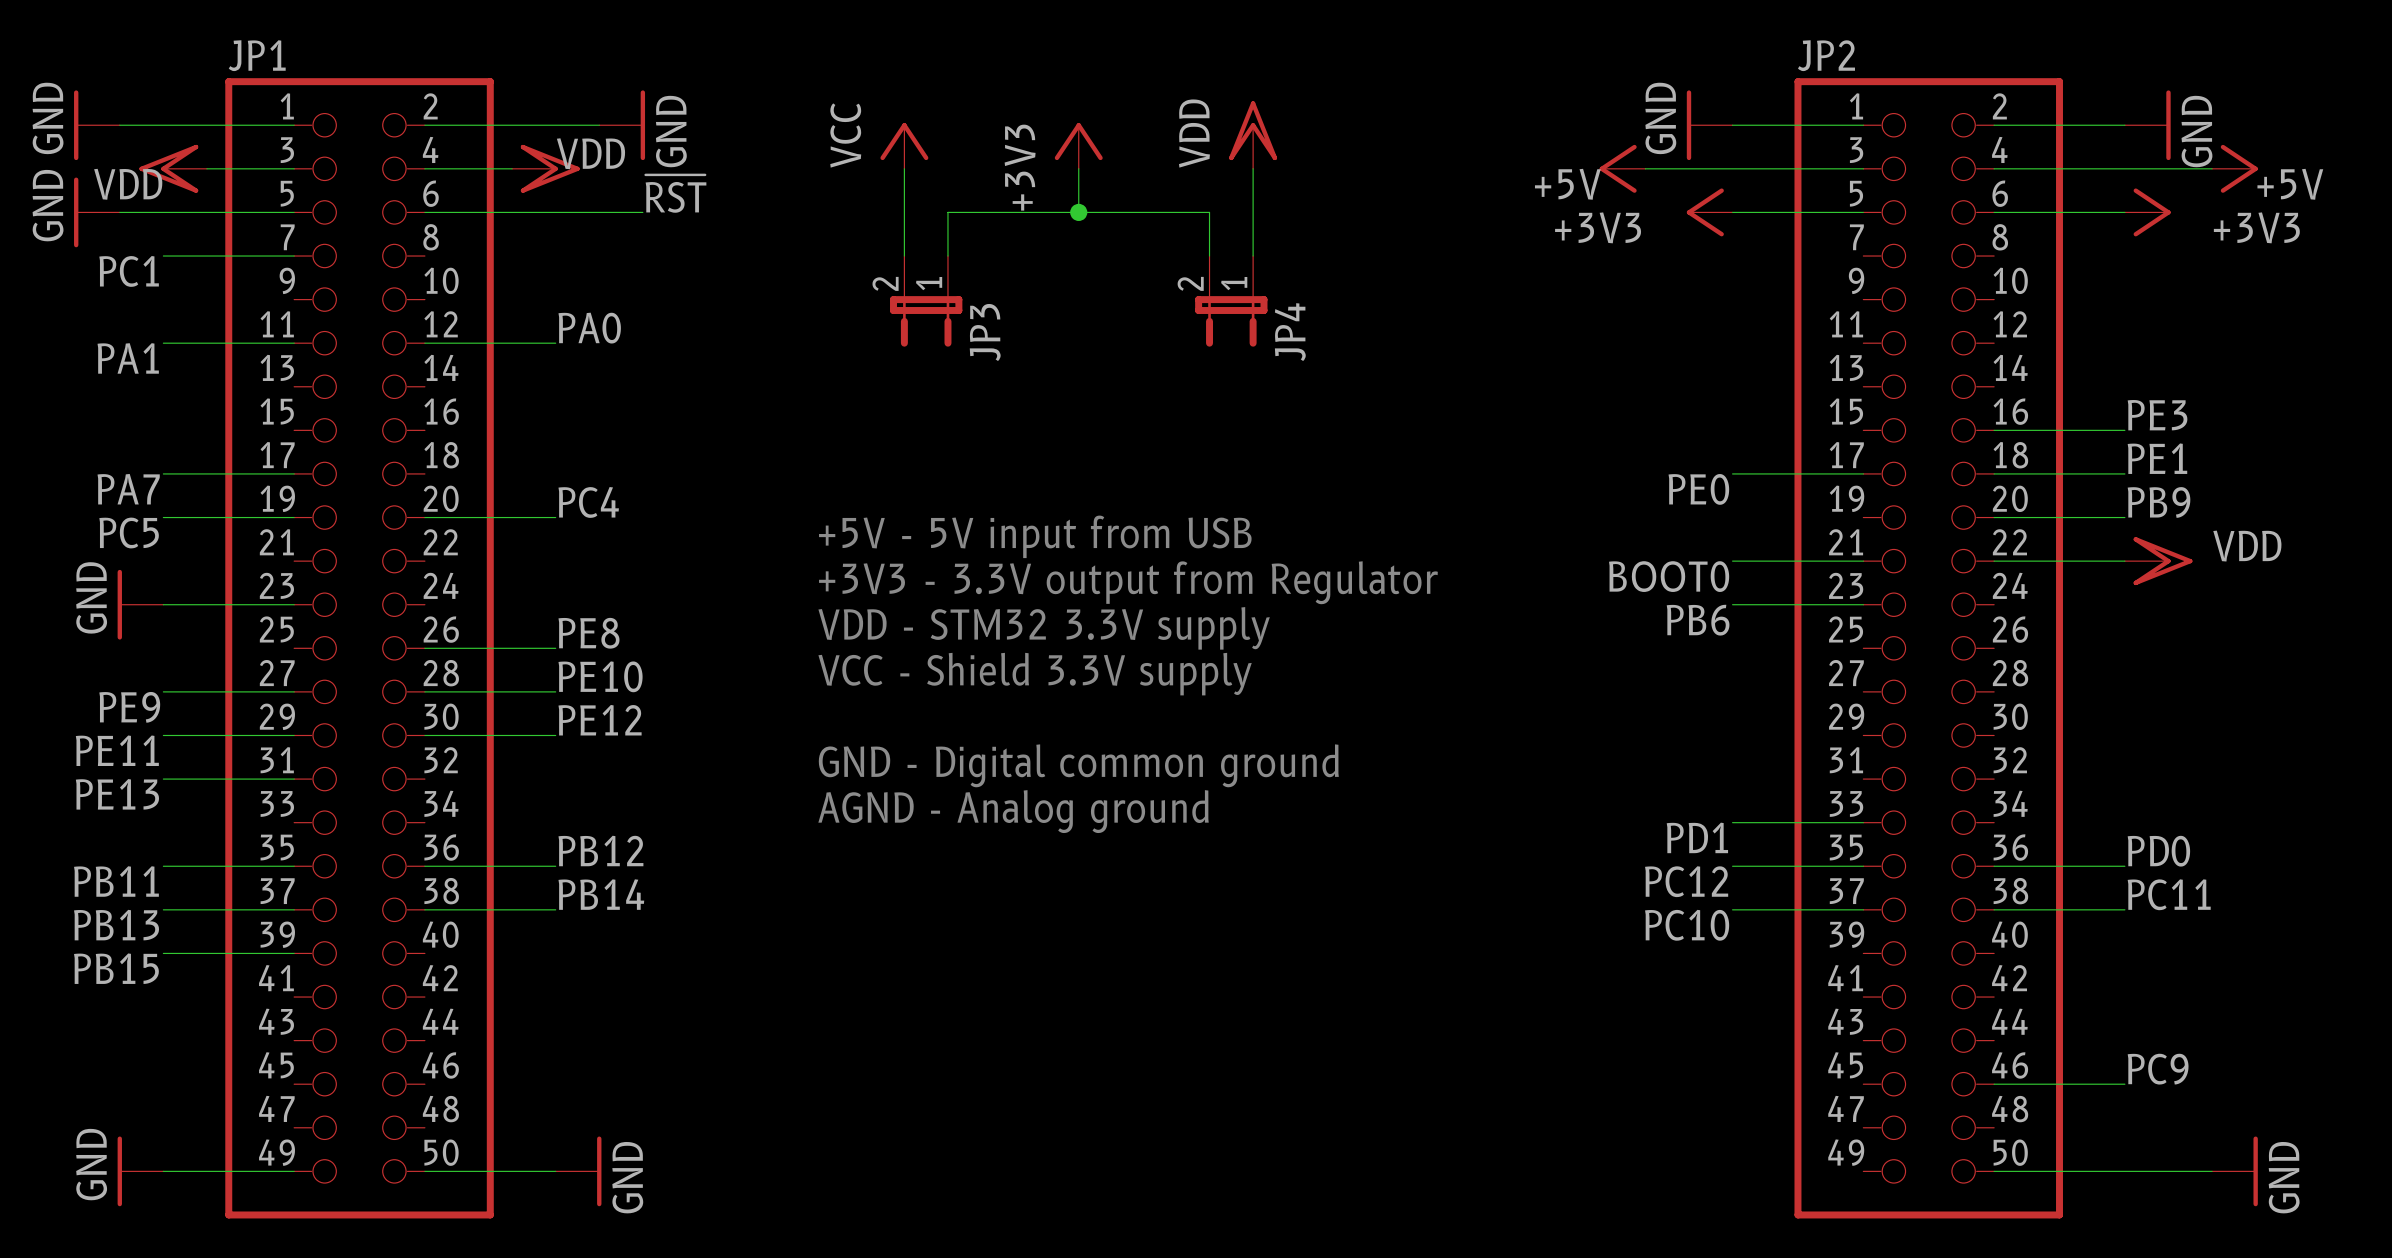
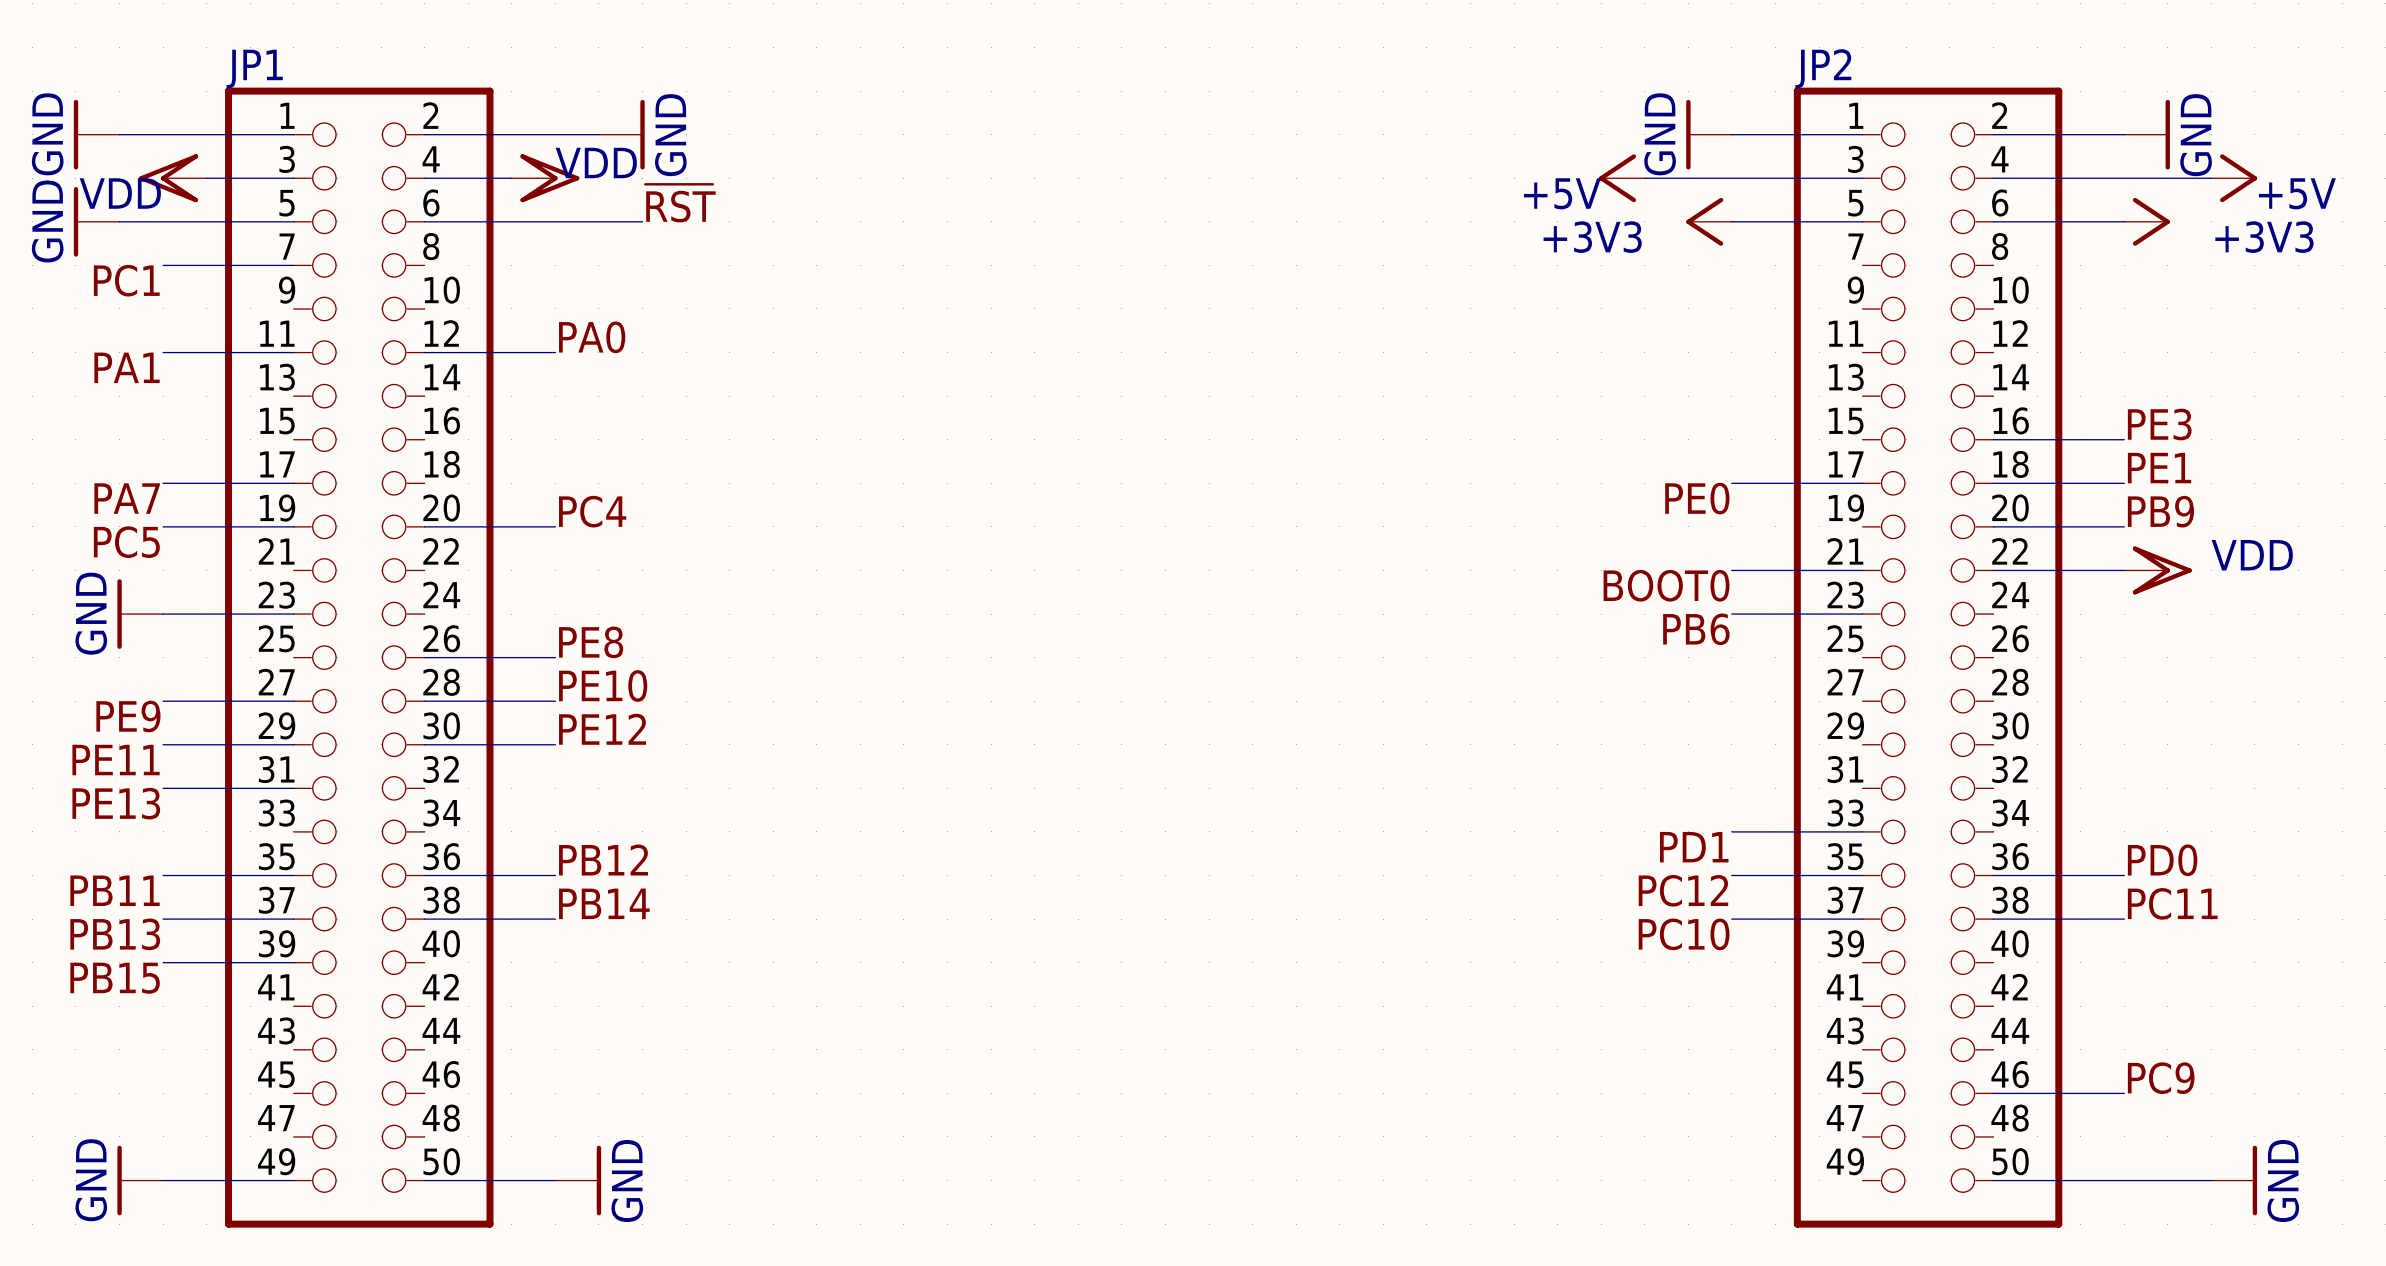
power symbol: VDD (1253, 135) -> none
power symbol: VCC (904, 145) -> none
power symbol: +3V3 (1078, 145) -> none
wire: (904, 168) (904, 256) -> none
wire: (1078, 168) (1078, 212) -> none
wire: (1253, 168) (1253, 256) -> none
junction: (1078, 212) -> none
wire: (947, 256) (947, 212) (1209, 212) (1209, 256) -> none
JP3: (926, 301) -> none
JP4: (1231, 301) -> none
text: +5V - 5V input from USB (1035, 536) -> none
text: +3V3 - 3.3V output from Regulator (1128, 582) -> none
text: VDD - STM32 3.3V supply (1044, 628) -> none
text: VCC - Shield 3.3V supply (1035, 674) -> none
text: GND - Digital common ground (1078, 765) -> none
text: AGND - Analog ground (1013, 811) -> none

